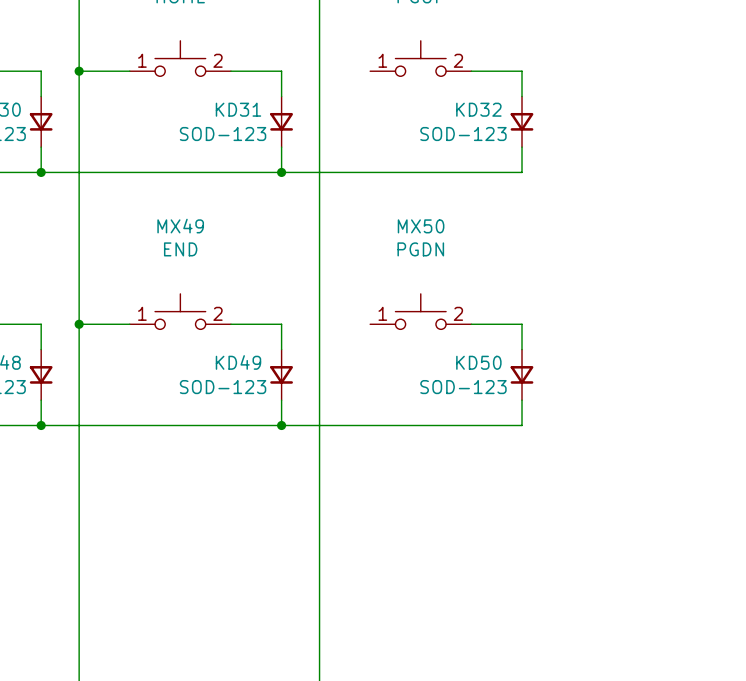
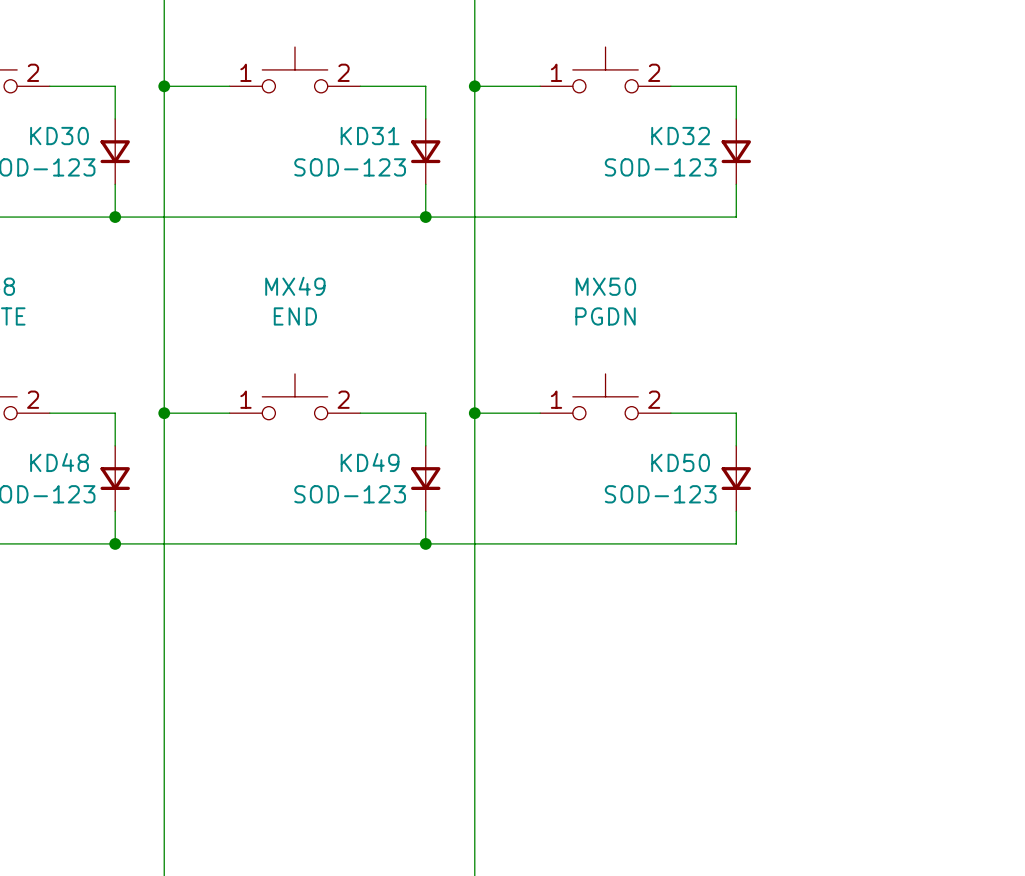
wire: none -> (474, 86) (540, 86)
junction: none -> (474, 86)
wire: none -> (474, 413) (540, 413)
junction: none -> (474, 413)

